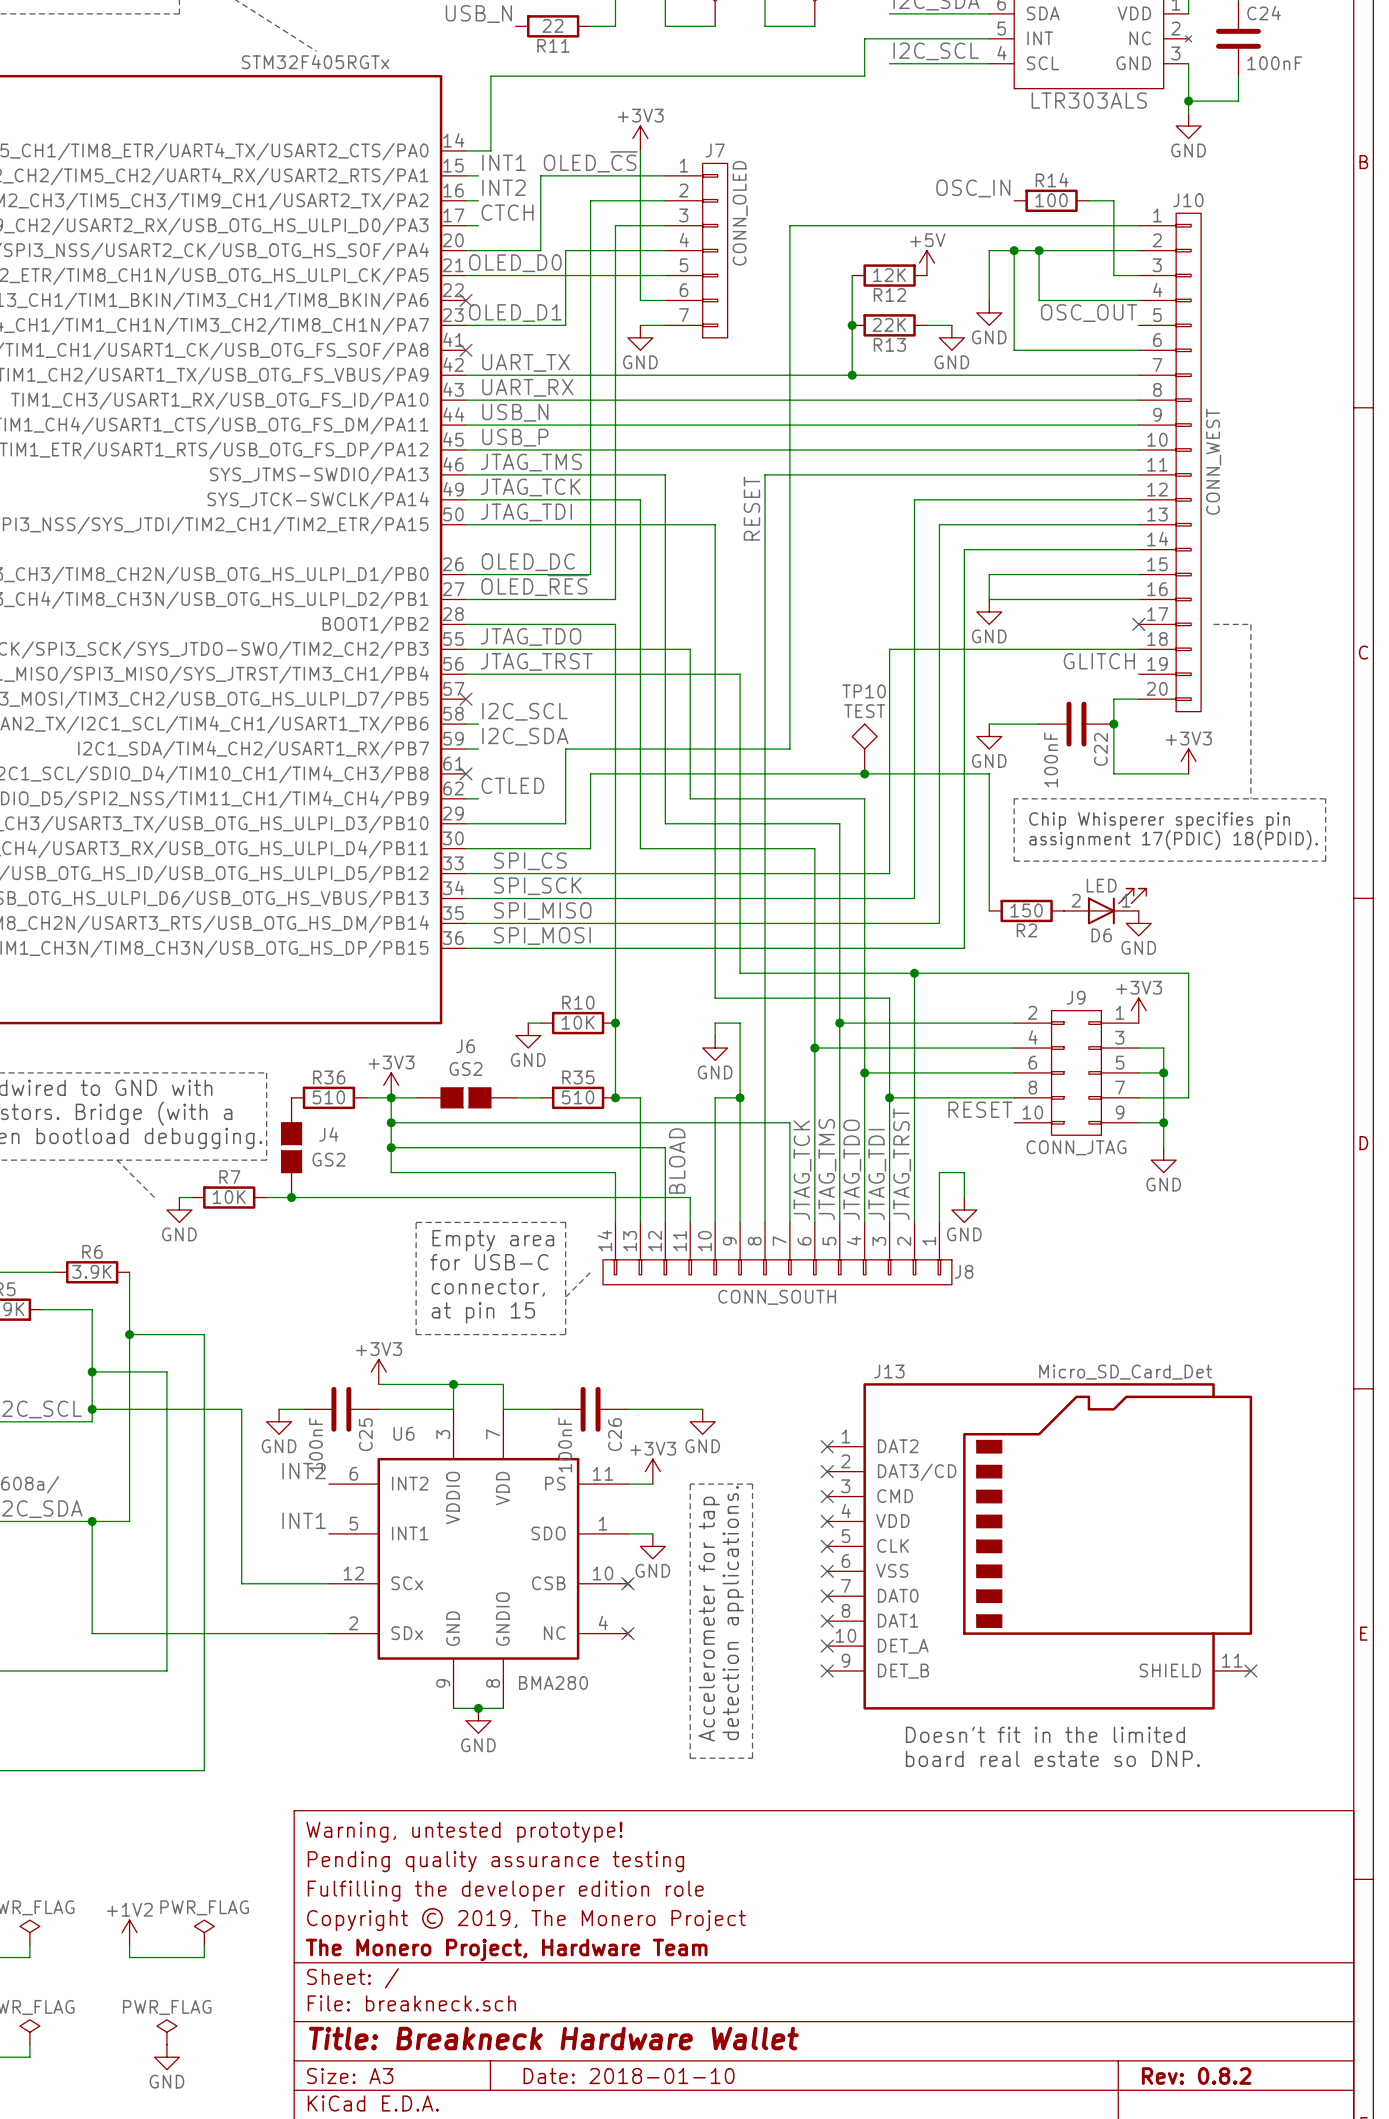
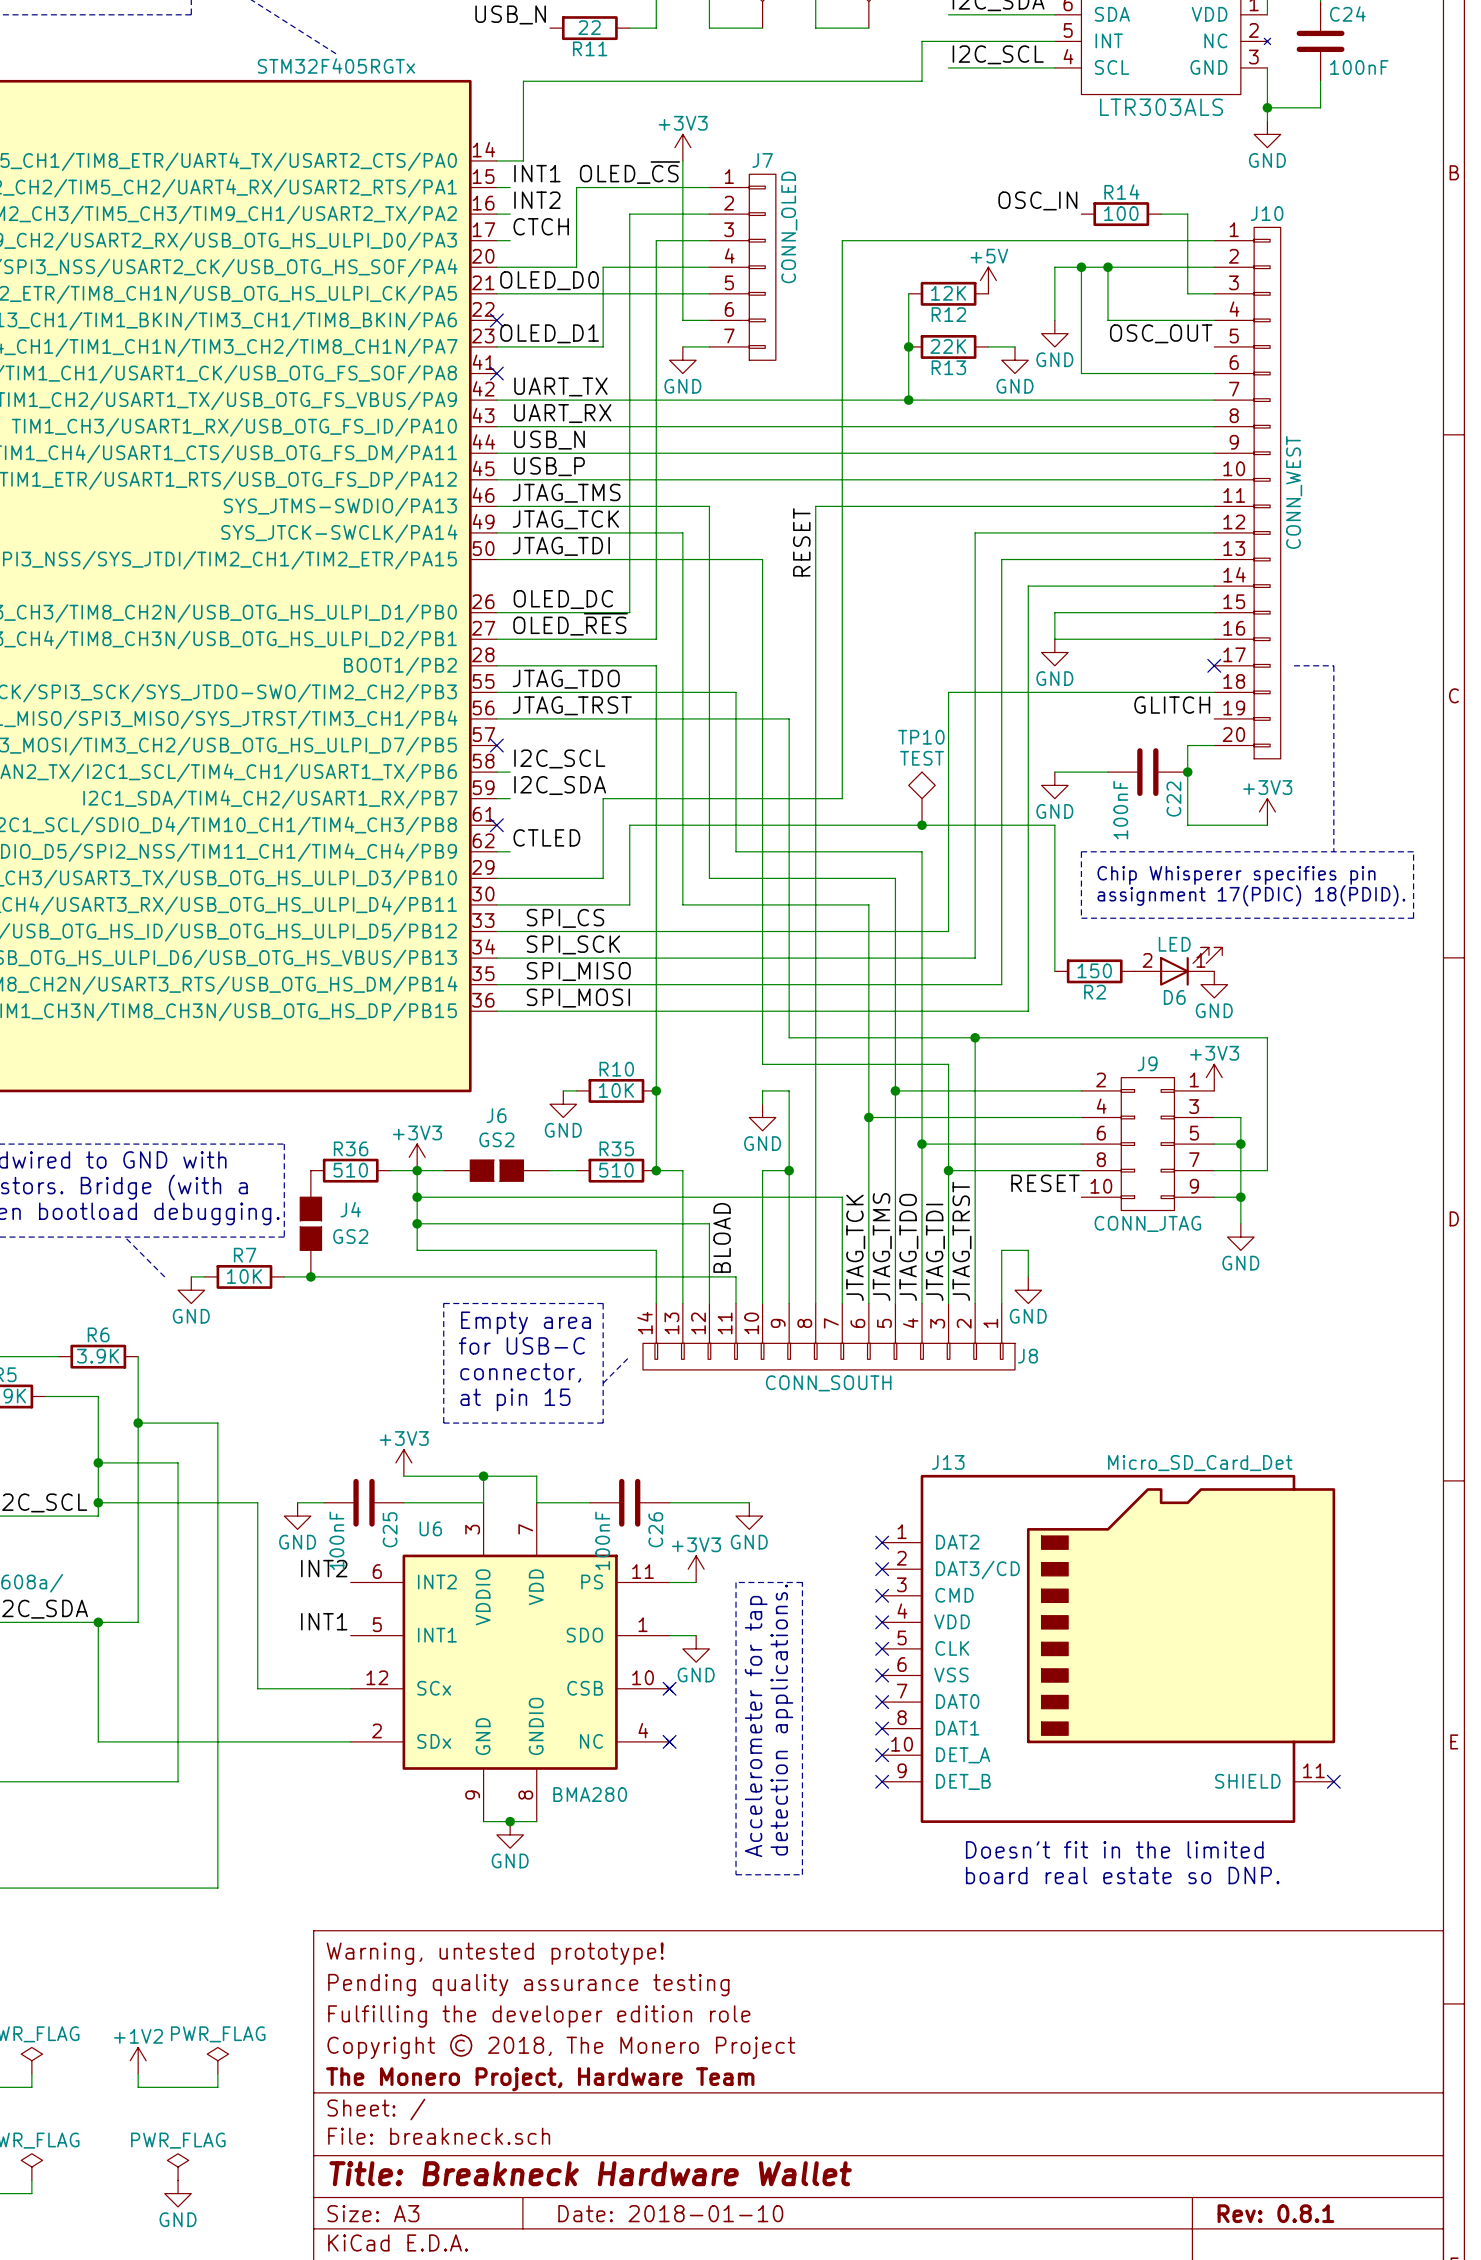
title block: Copyright © 2019, The Monero Project (526, 1919) -> Copyright © 2018, The Monero Project (561, 2046)
title block: Rev: 0.8.2 (1196, 2076) -> Rev: 0.8.1 (1275, 2213)

